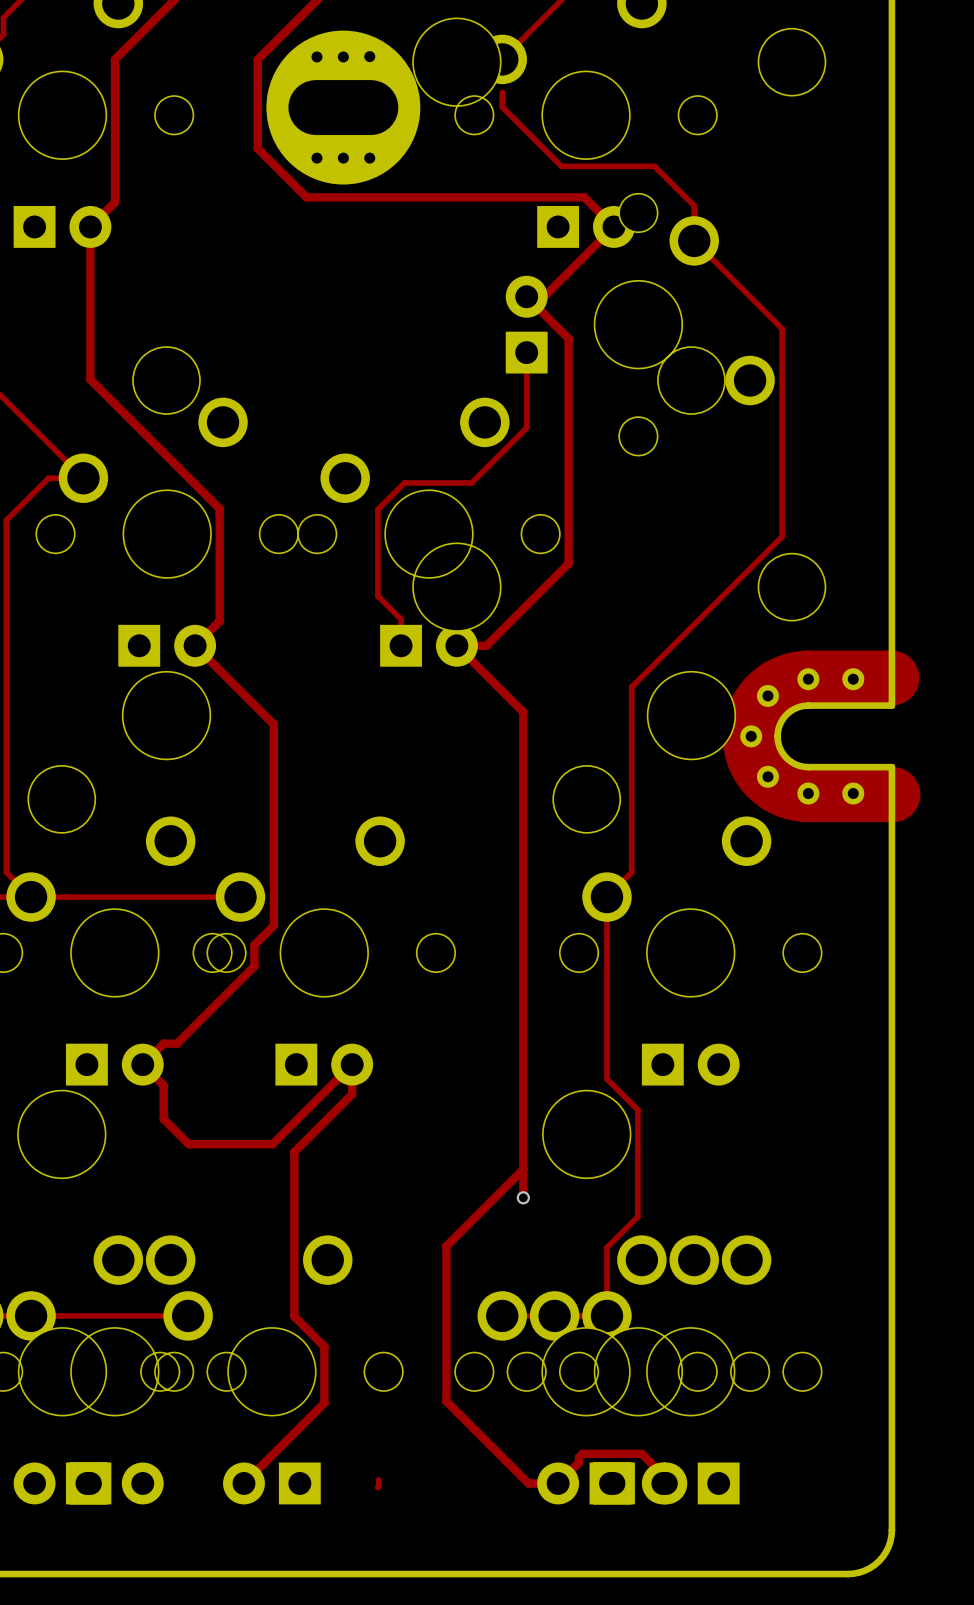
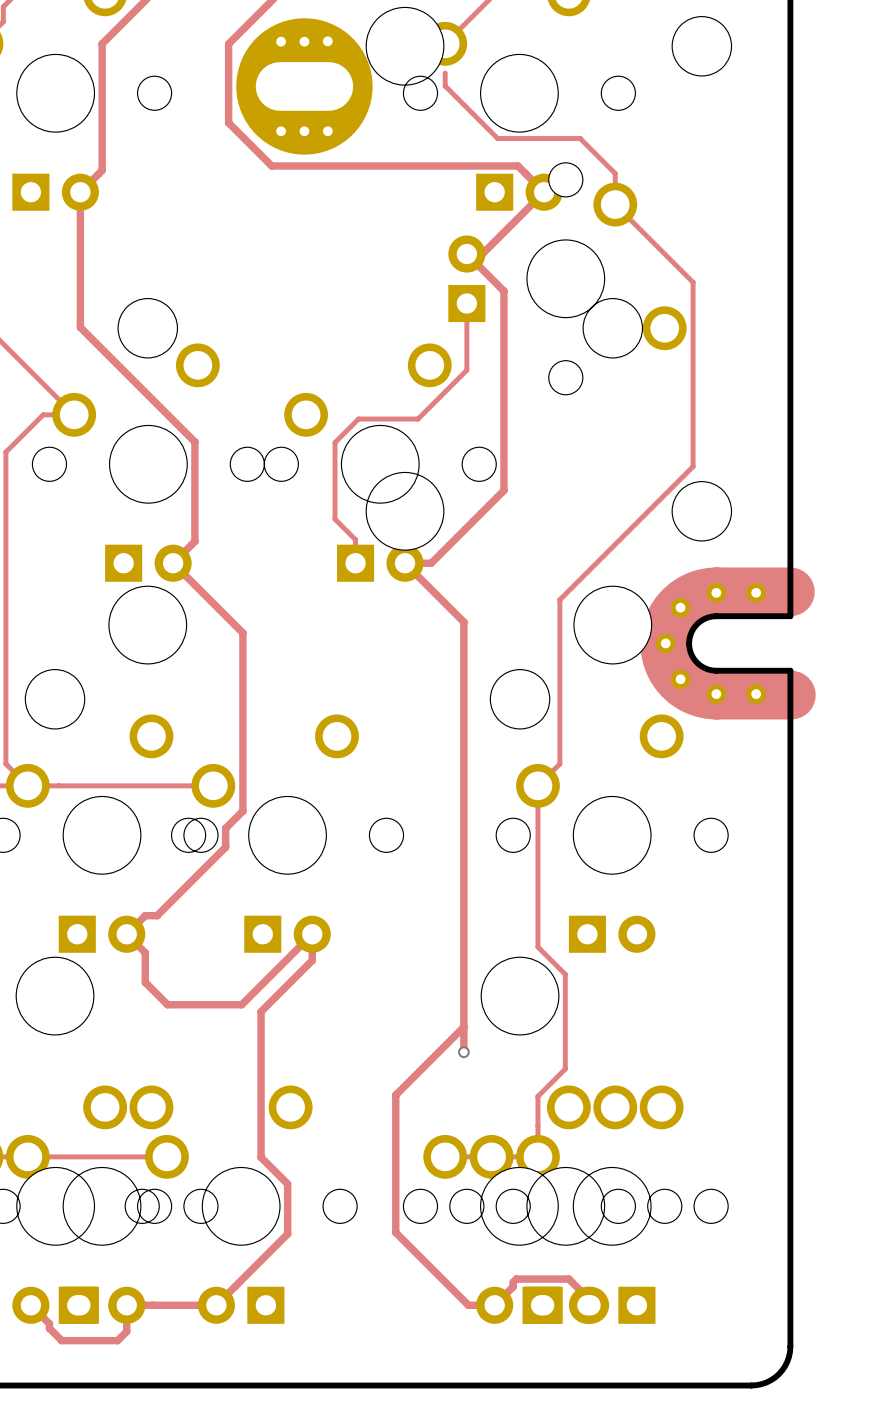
track: (378, 1479) (377, 1487) -> none
track: none -> (30, 1305) (49, 1323) (49, 1328) (61, 1340) (117, 1340) (126, 1331) (126, 1305) (216, 1305)

